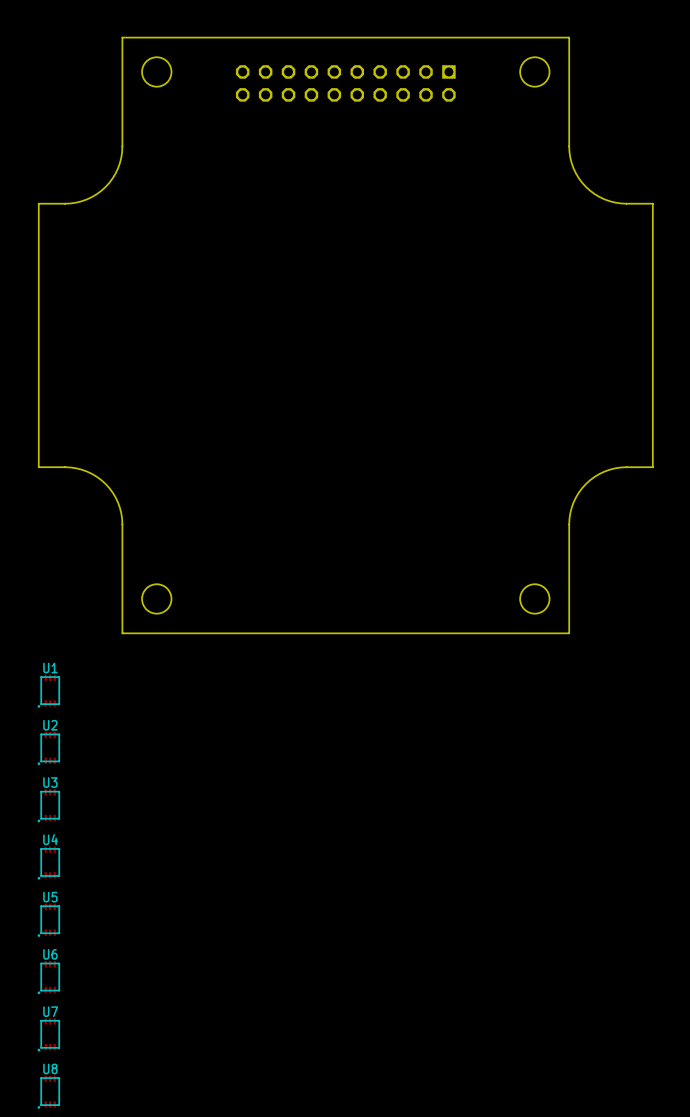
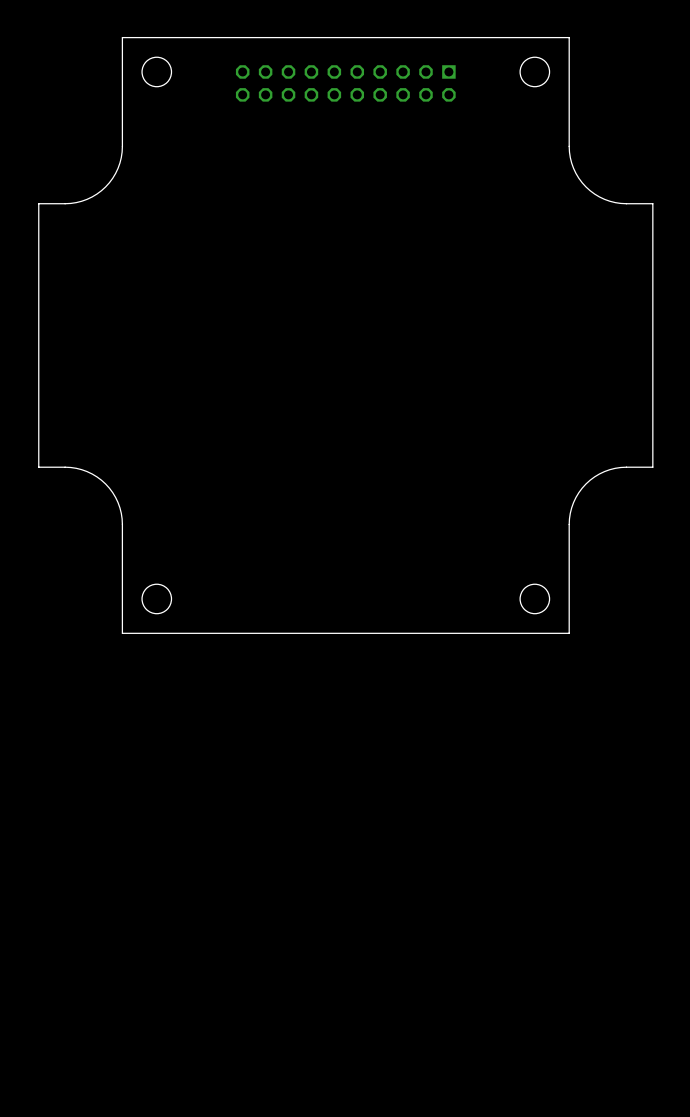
U1: (48, 691) -> none
U2: (48, 748) -> none
U3: (48, 805) -> none
U4: (48, 863) -> none
U5: (48, 920) -> none
U6: (48, 977) -> none
U7: (48, 1034) -> none
U8: (48, 1092) -> none

